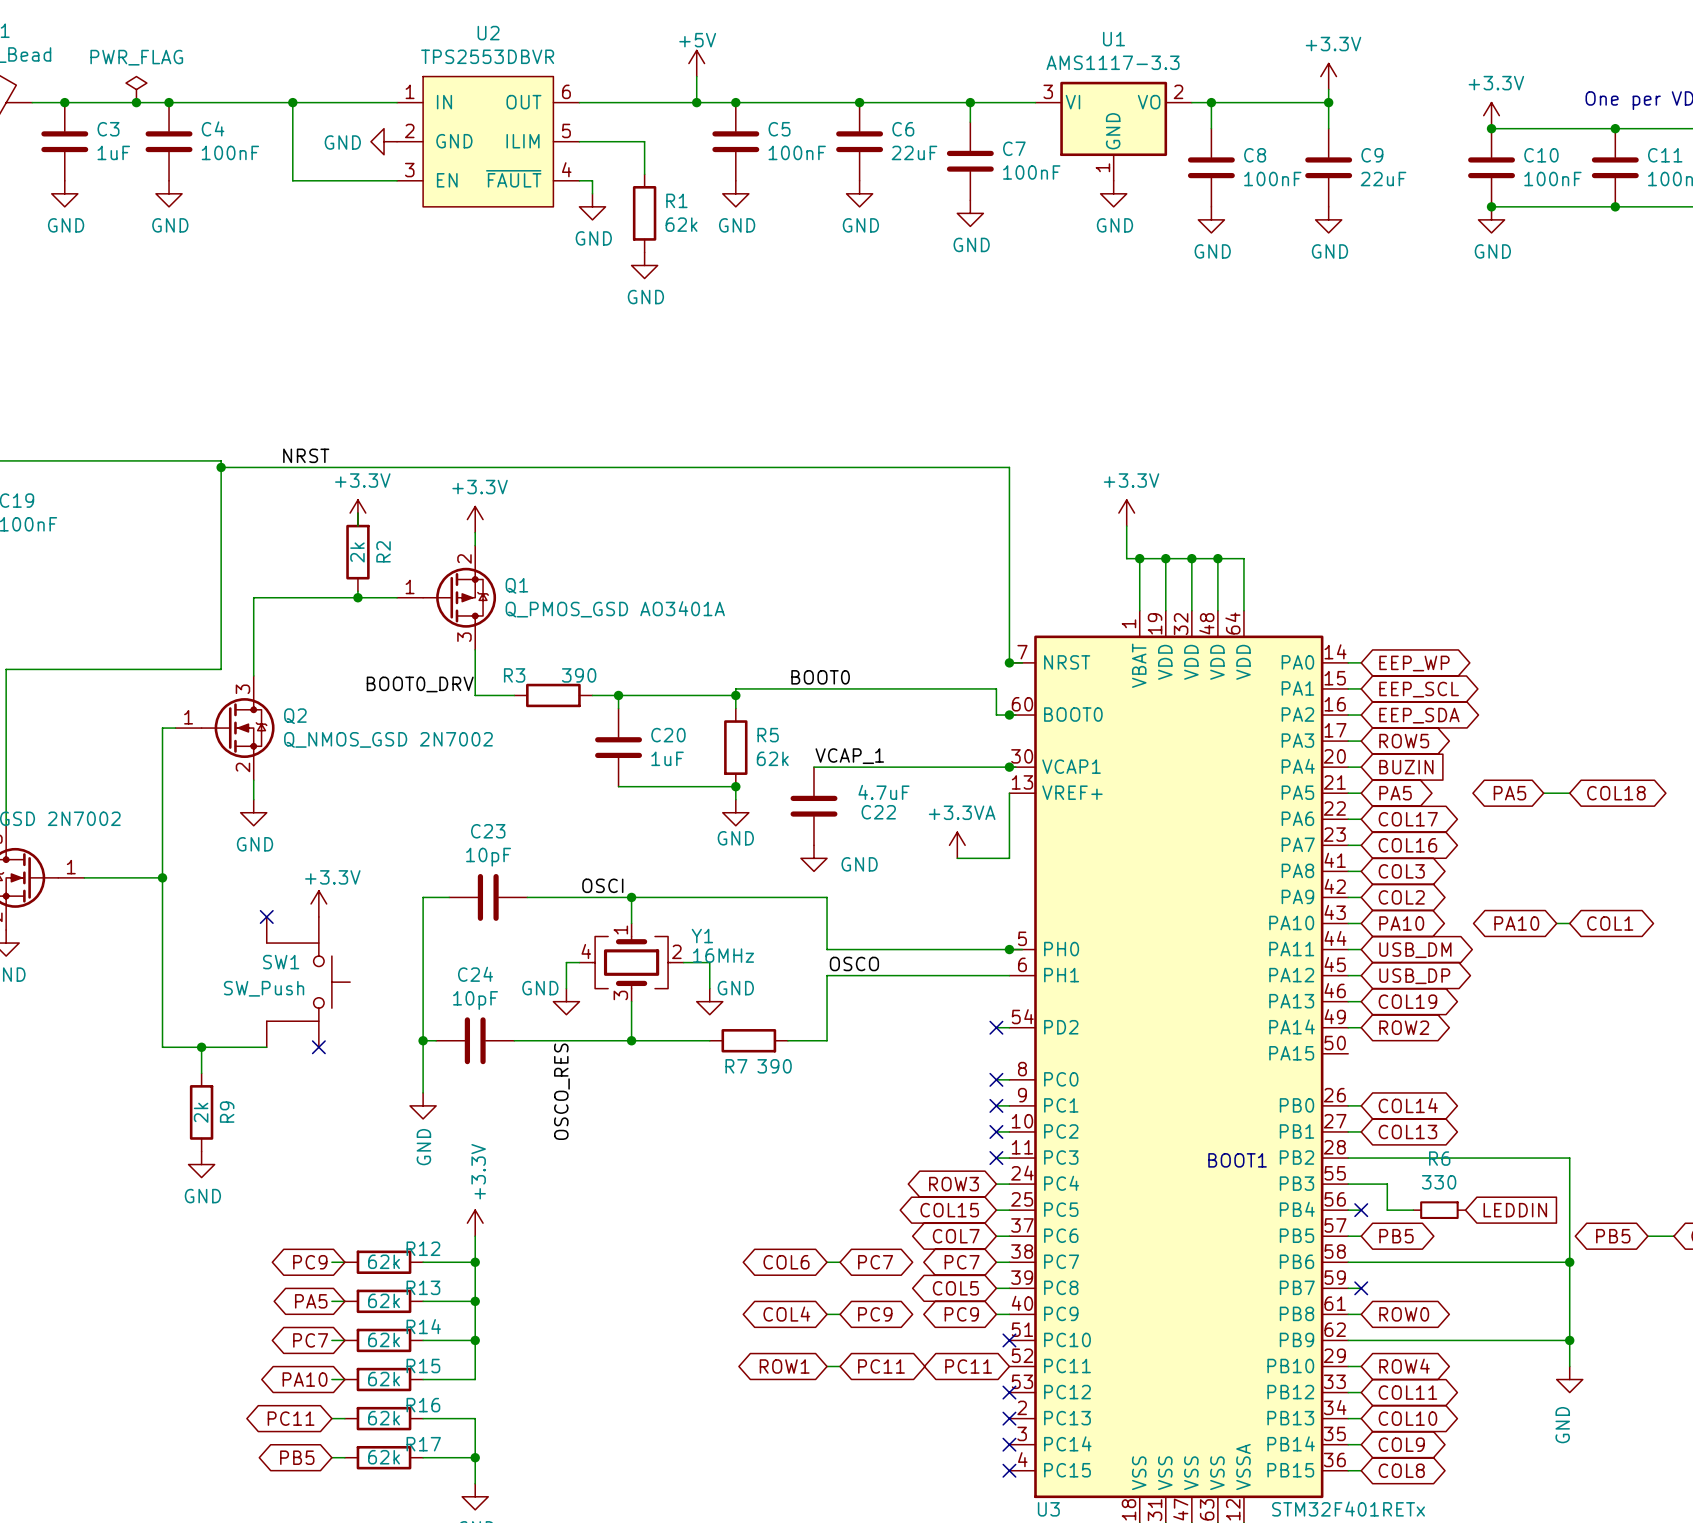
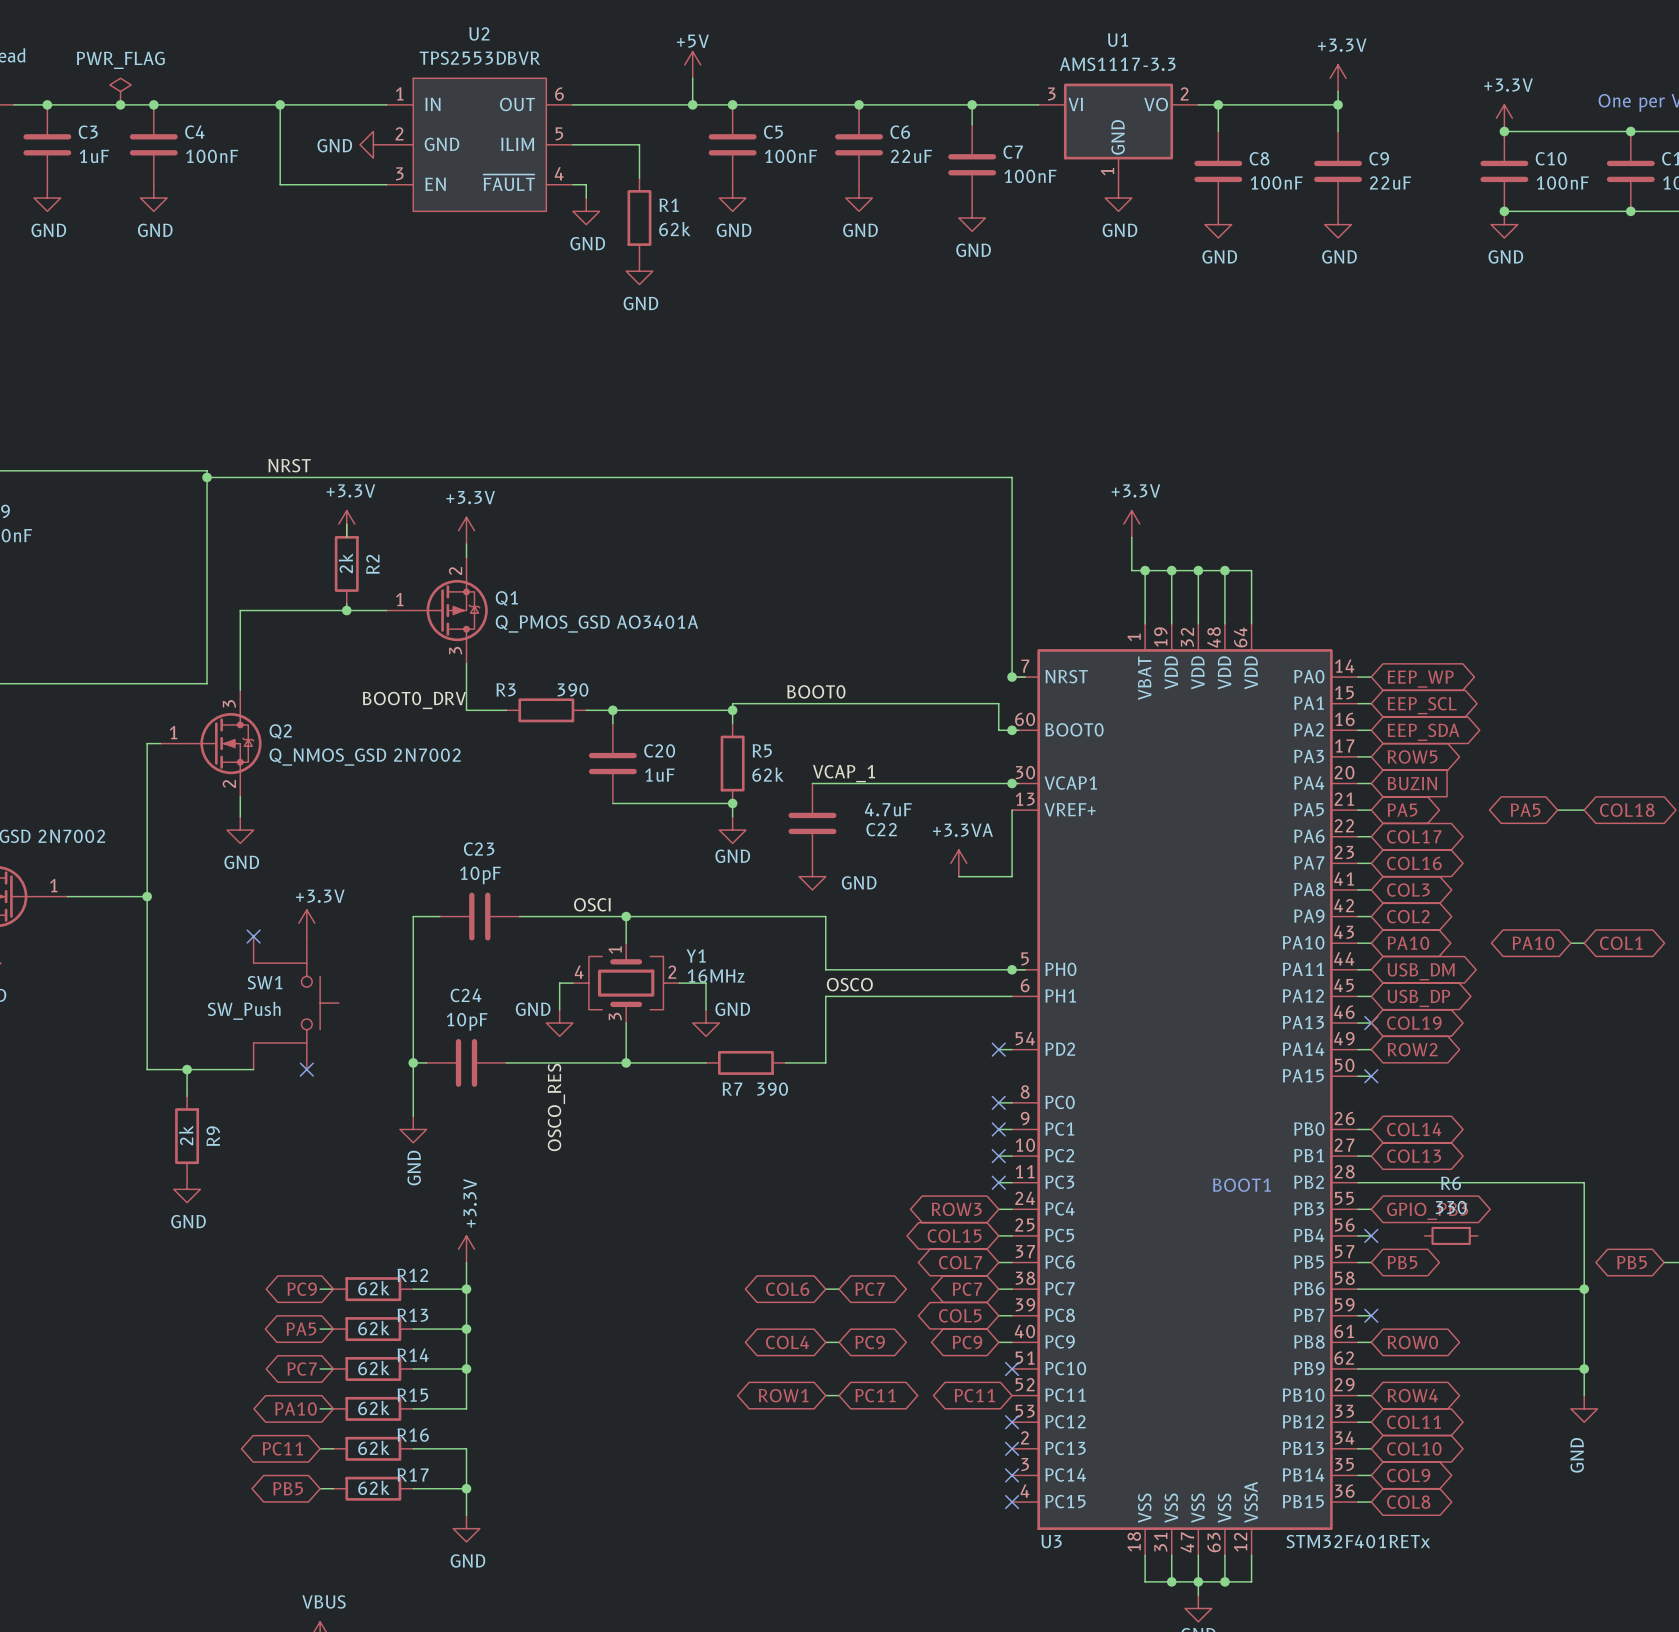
no-connect mark: none -> (1371, 1023)
wire: none -> (1358, 1076) (1371, 1076)
no-connect mark: none -> (1371, 1076)
wire: (1361, 1184) (1387, 1184) (1387, 1210) (1413, 1210) -> none
global label: none -> GPIO_PB3 (1427, 1211)
global label: LEDDIN (1515, 1210) -> none

